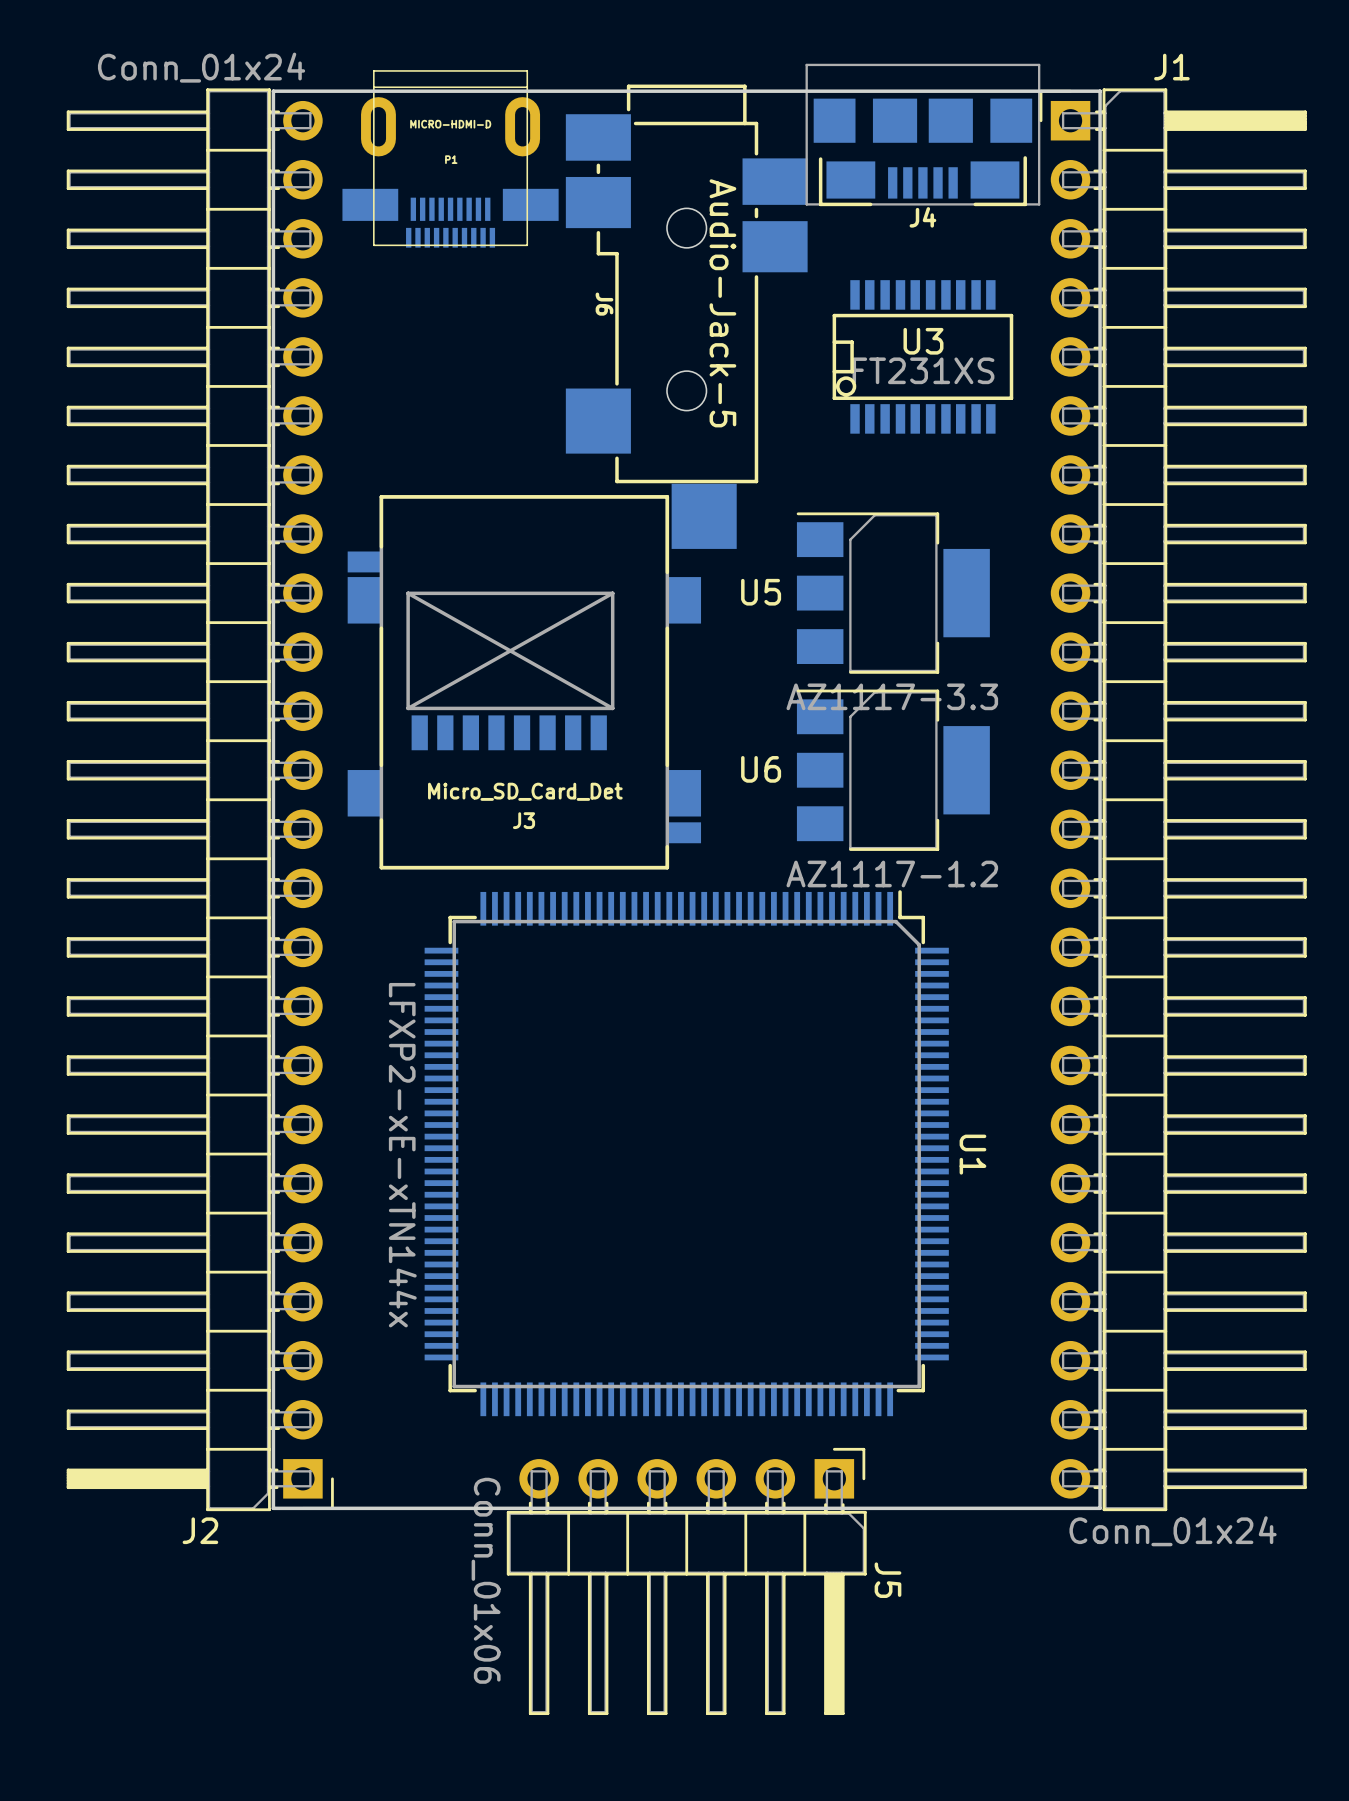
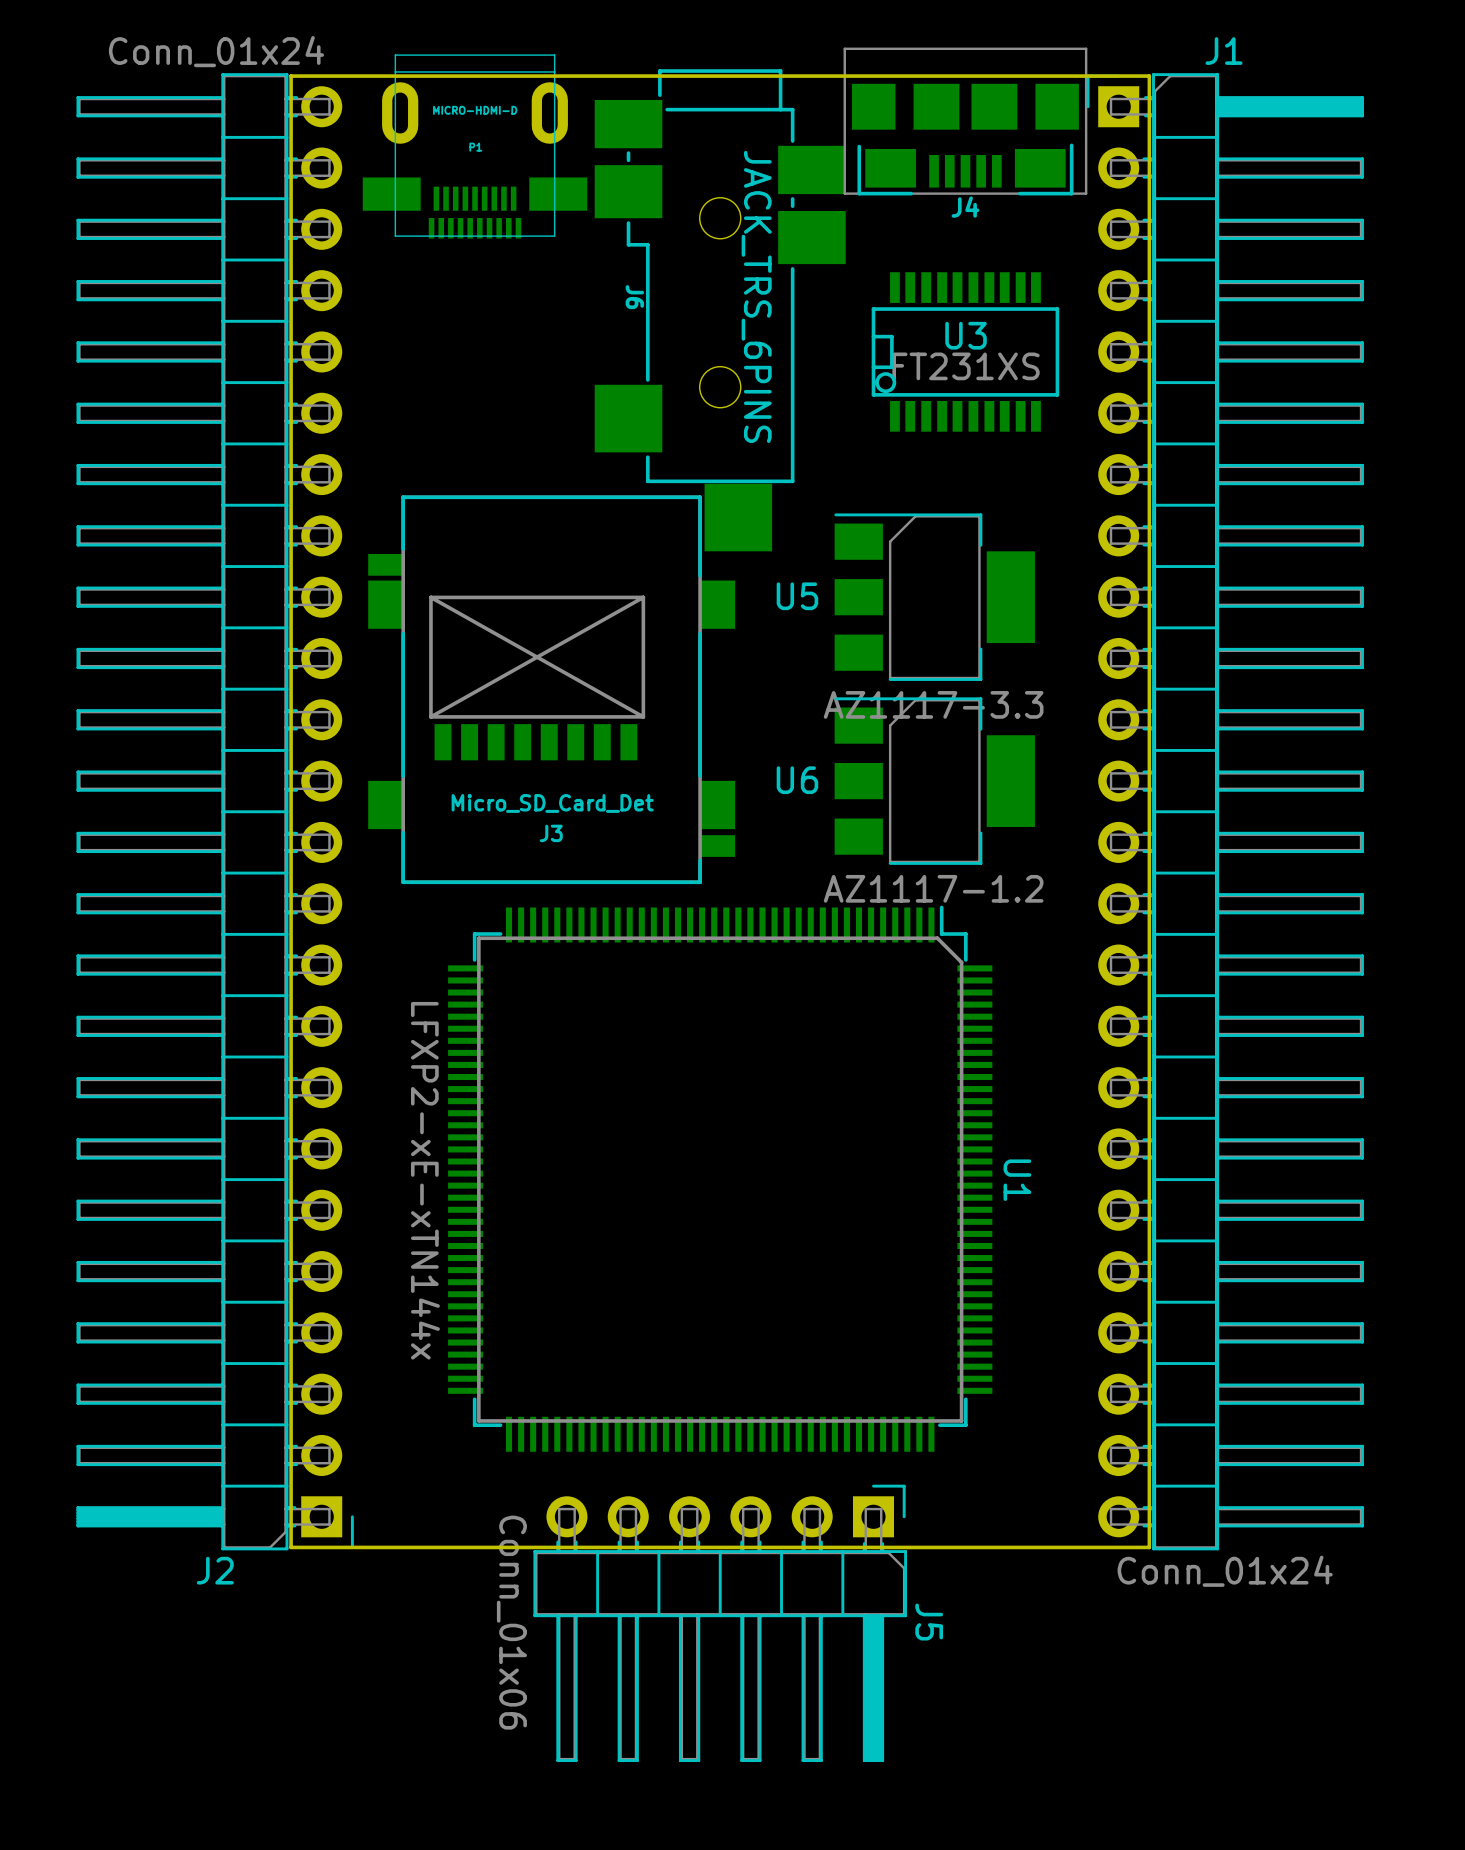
J6 value: Audio-Jack-5 (722, 303) -> JACK_TRS_6PINS (756, 296)

